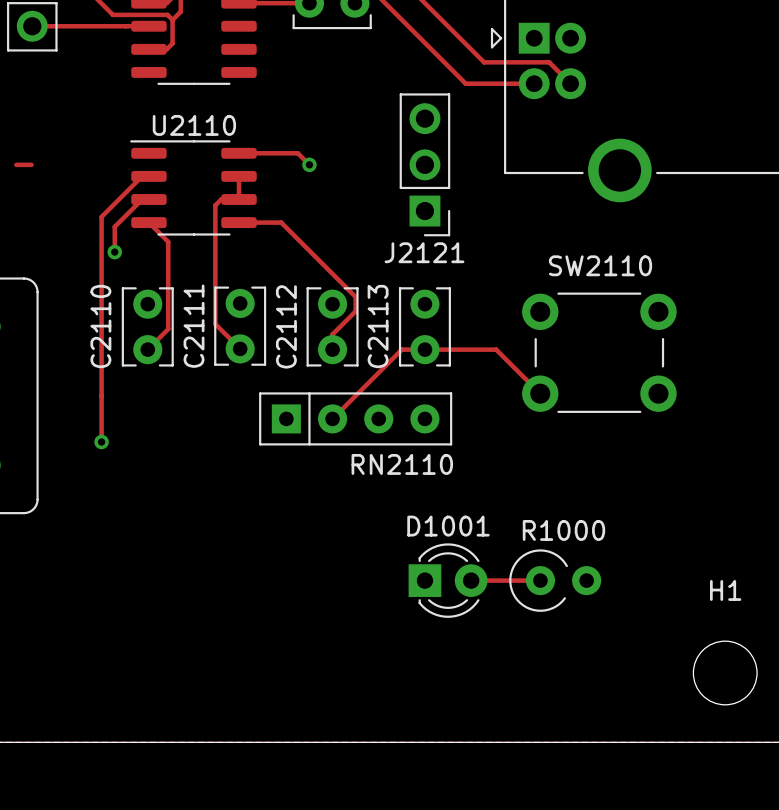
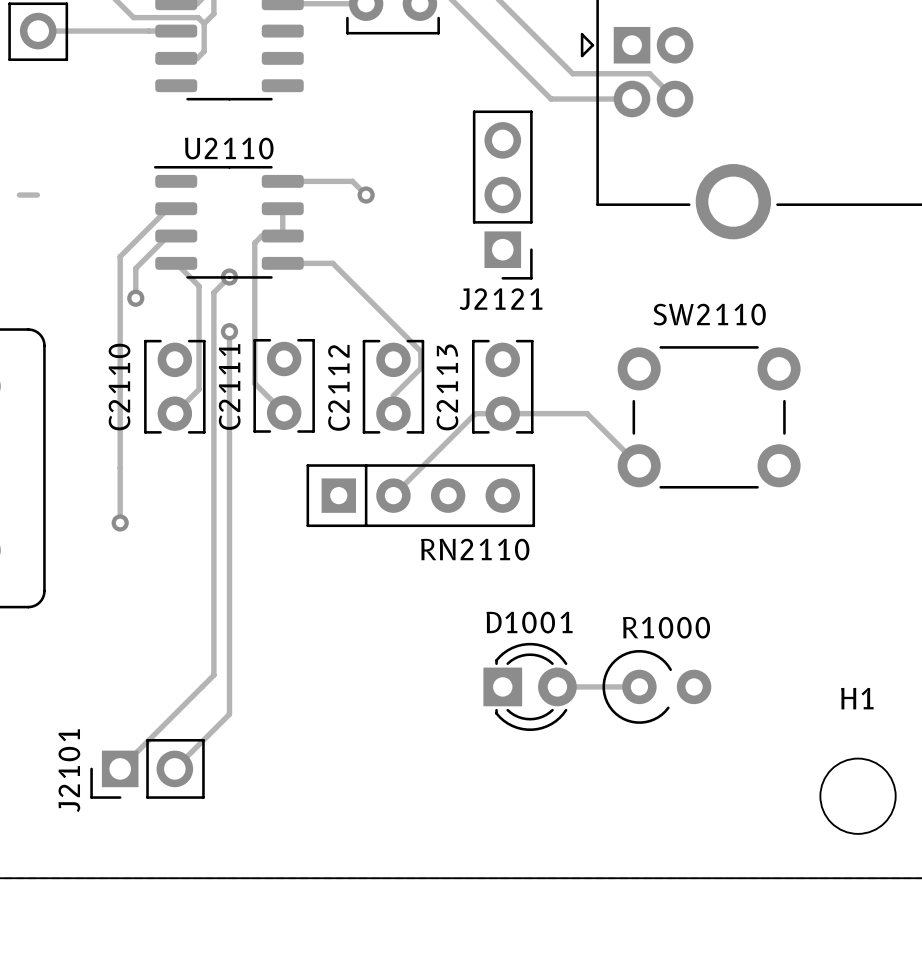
track: none -> (229, 277) (213, 292) (213, 675) (120, 768)
via: none -> (229, 277)
track: none -> (229, 331) (229, 714) (174, 768)
via: none -> (229, 331)
J2101: none -> (147, 768)

